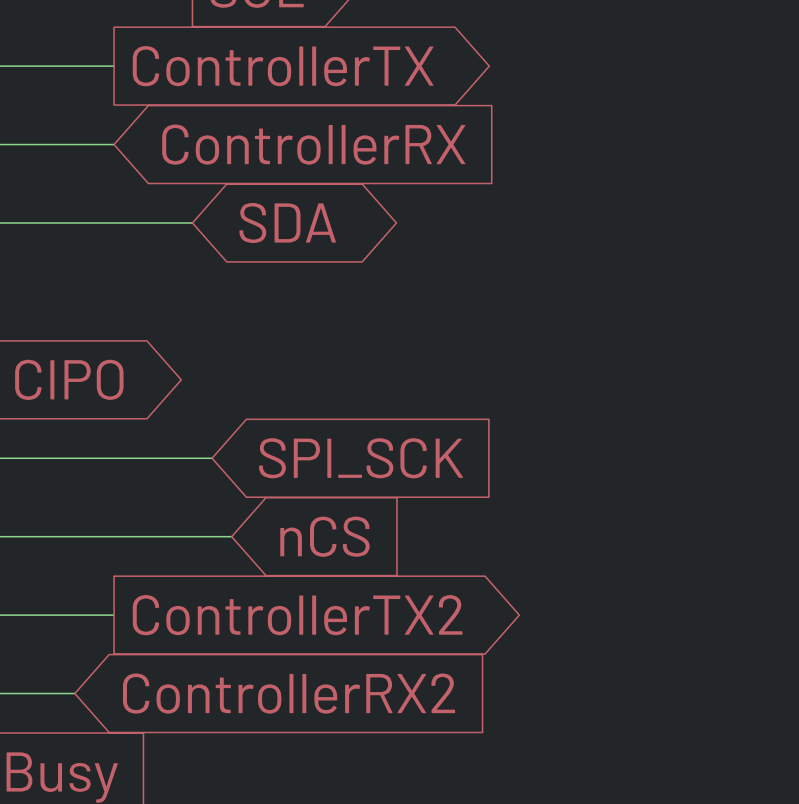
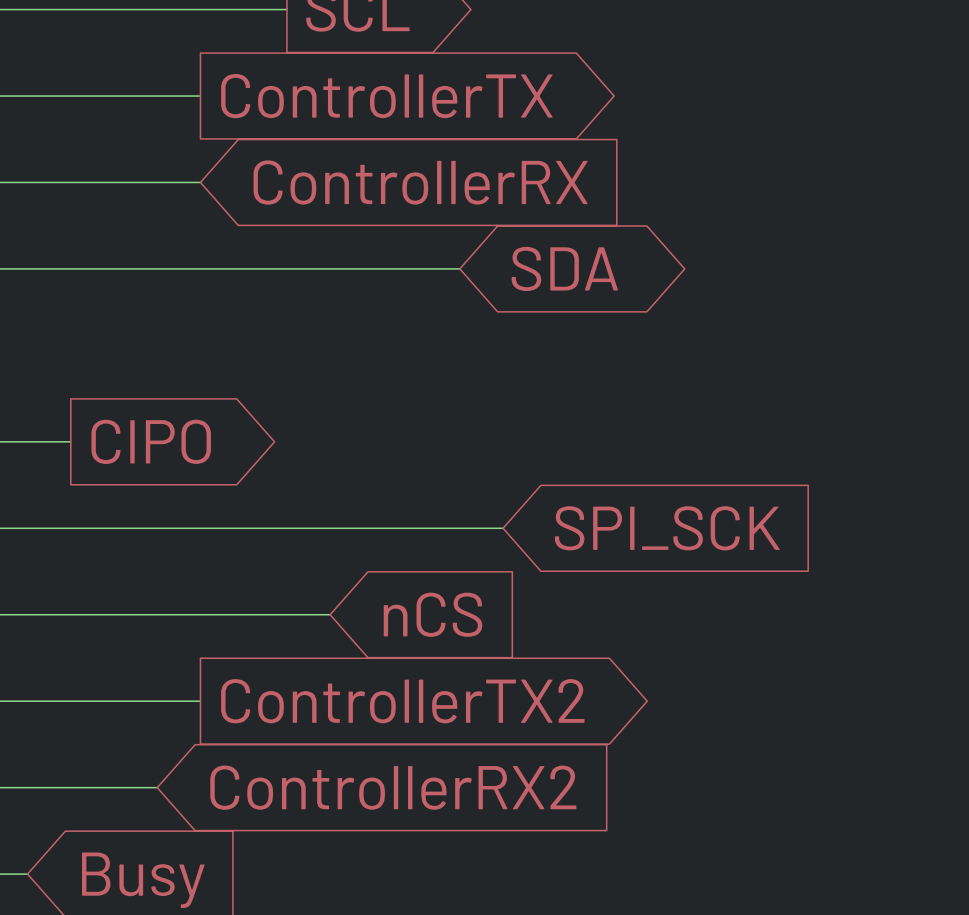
wire: none -> (286, 268) (459, 268)
global label position: SDA (287, 222) -> SDA (564, 268)
wire: none -> (308, 528) (503, 528)
global label position: SPI_SCK (361, 458) -> SPI_SCK (667, 528)

